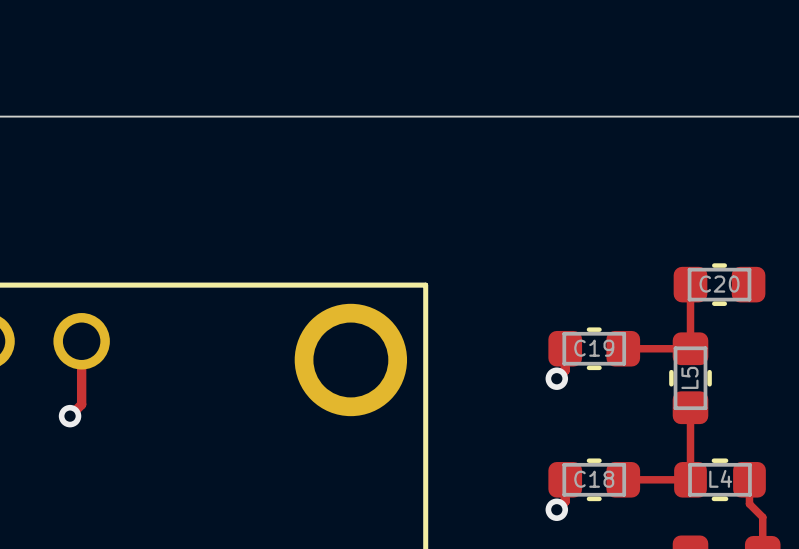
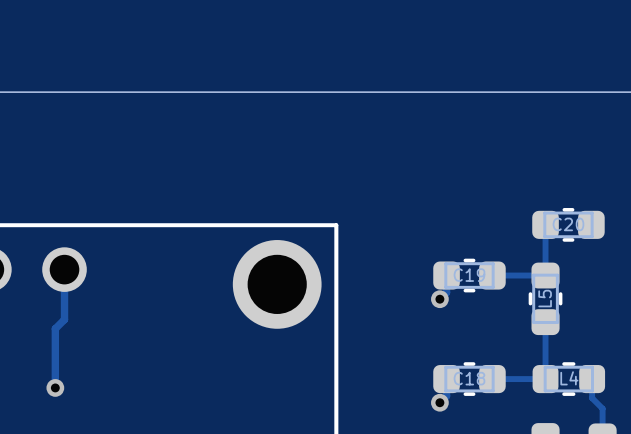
track: none -> (55, 328) (55, 387)
via: (70, 416) -> none
via: none -> (55, 387)

